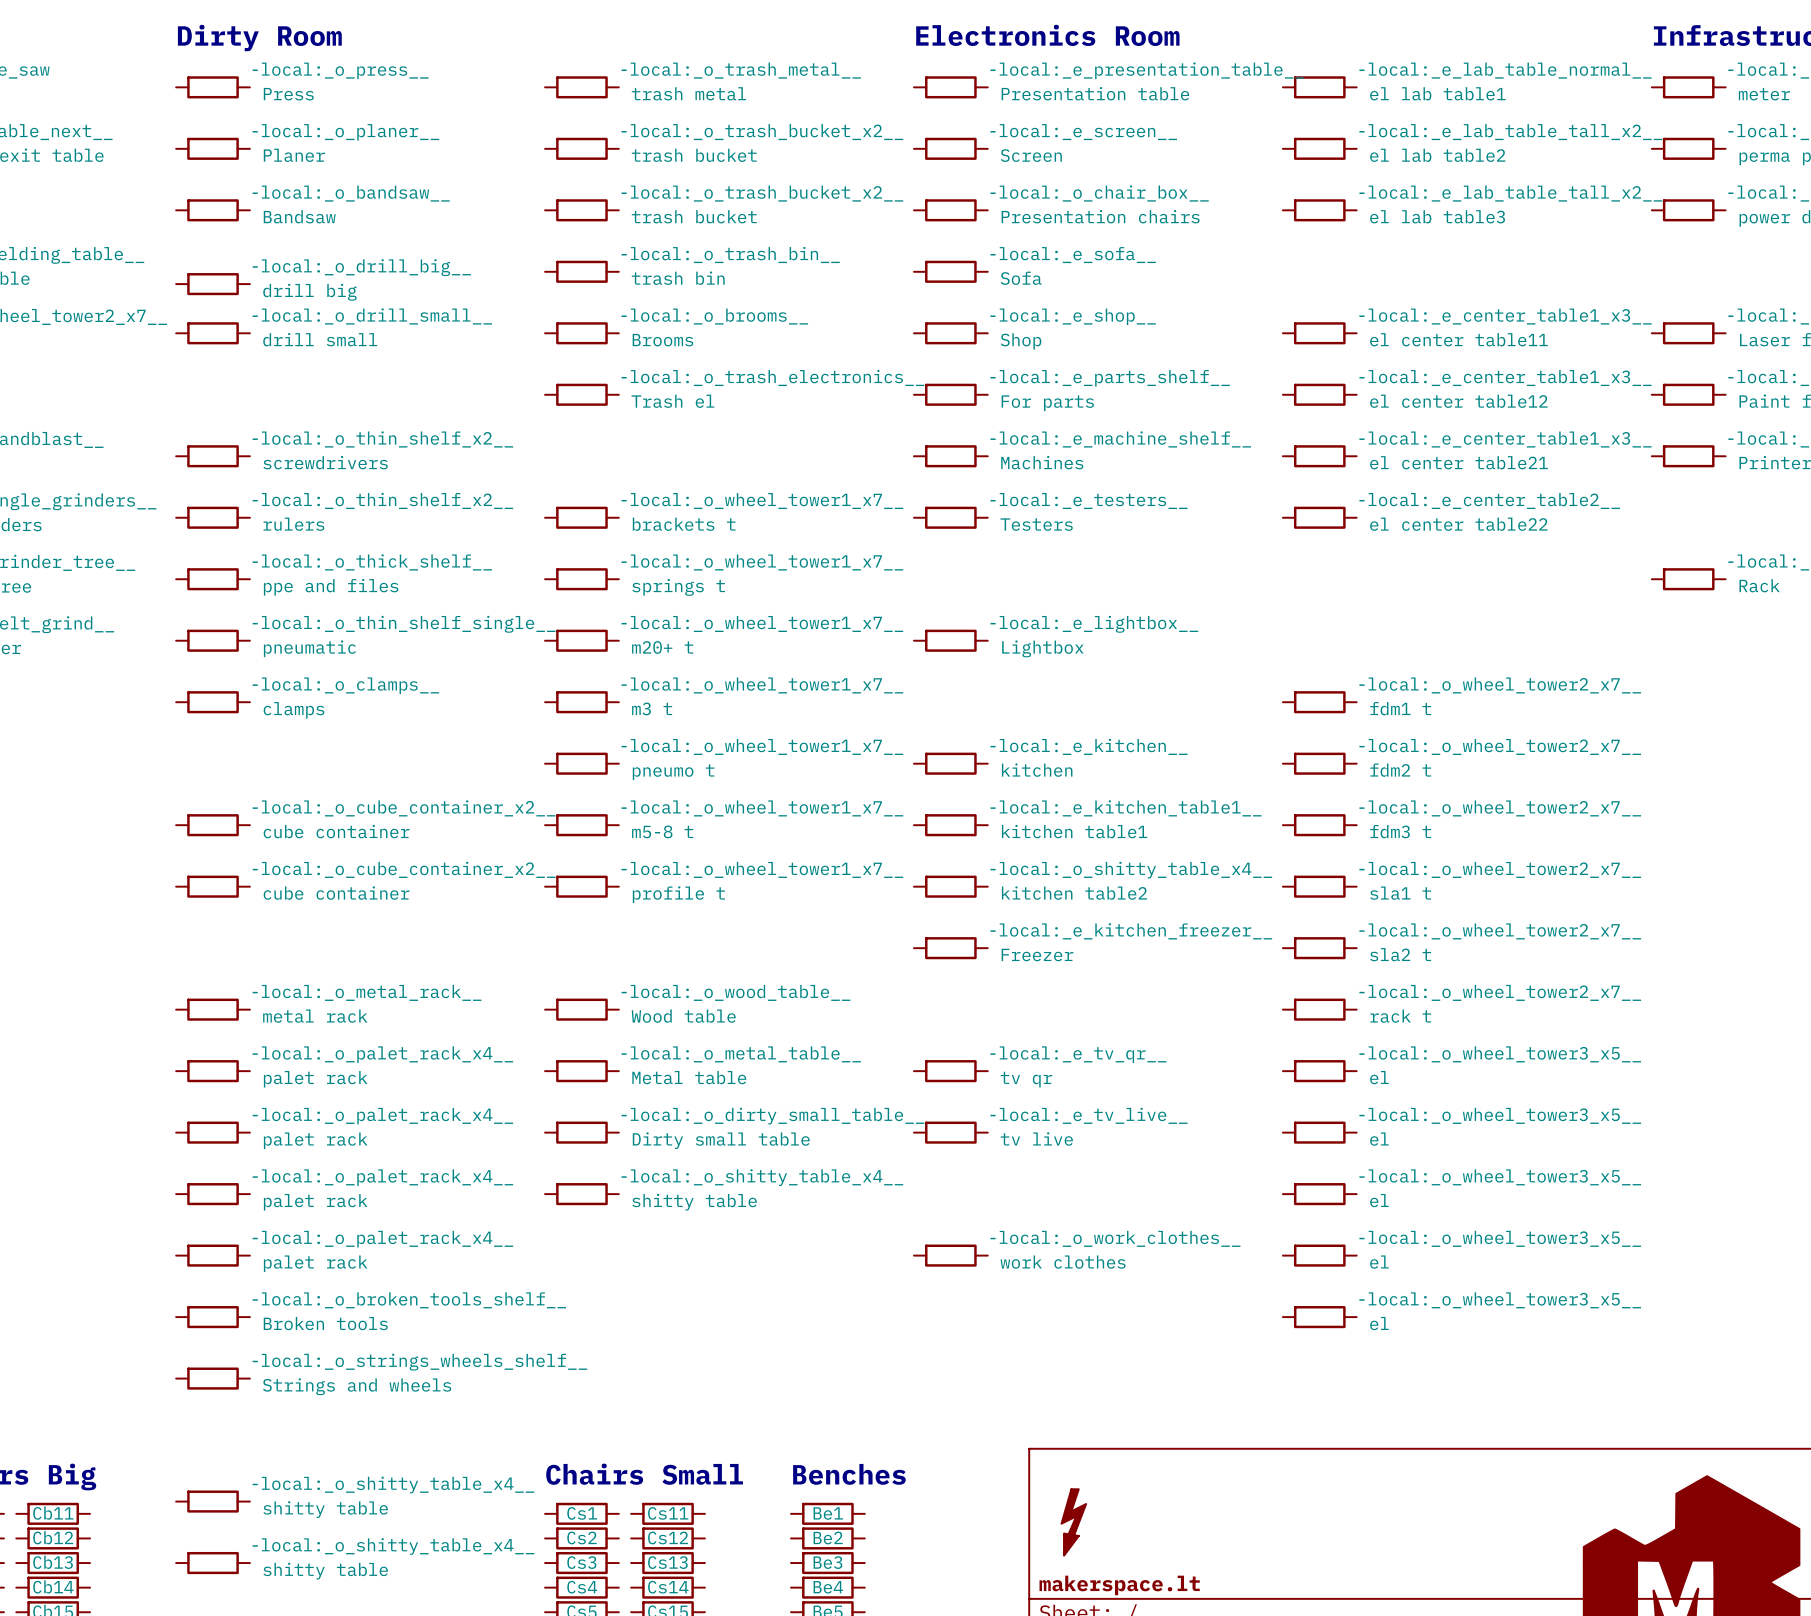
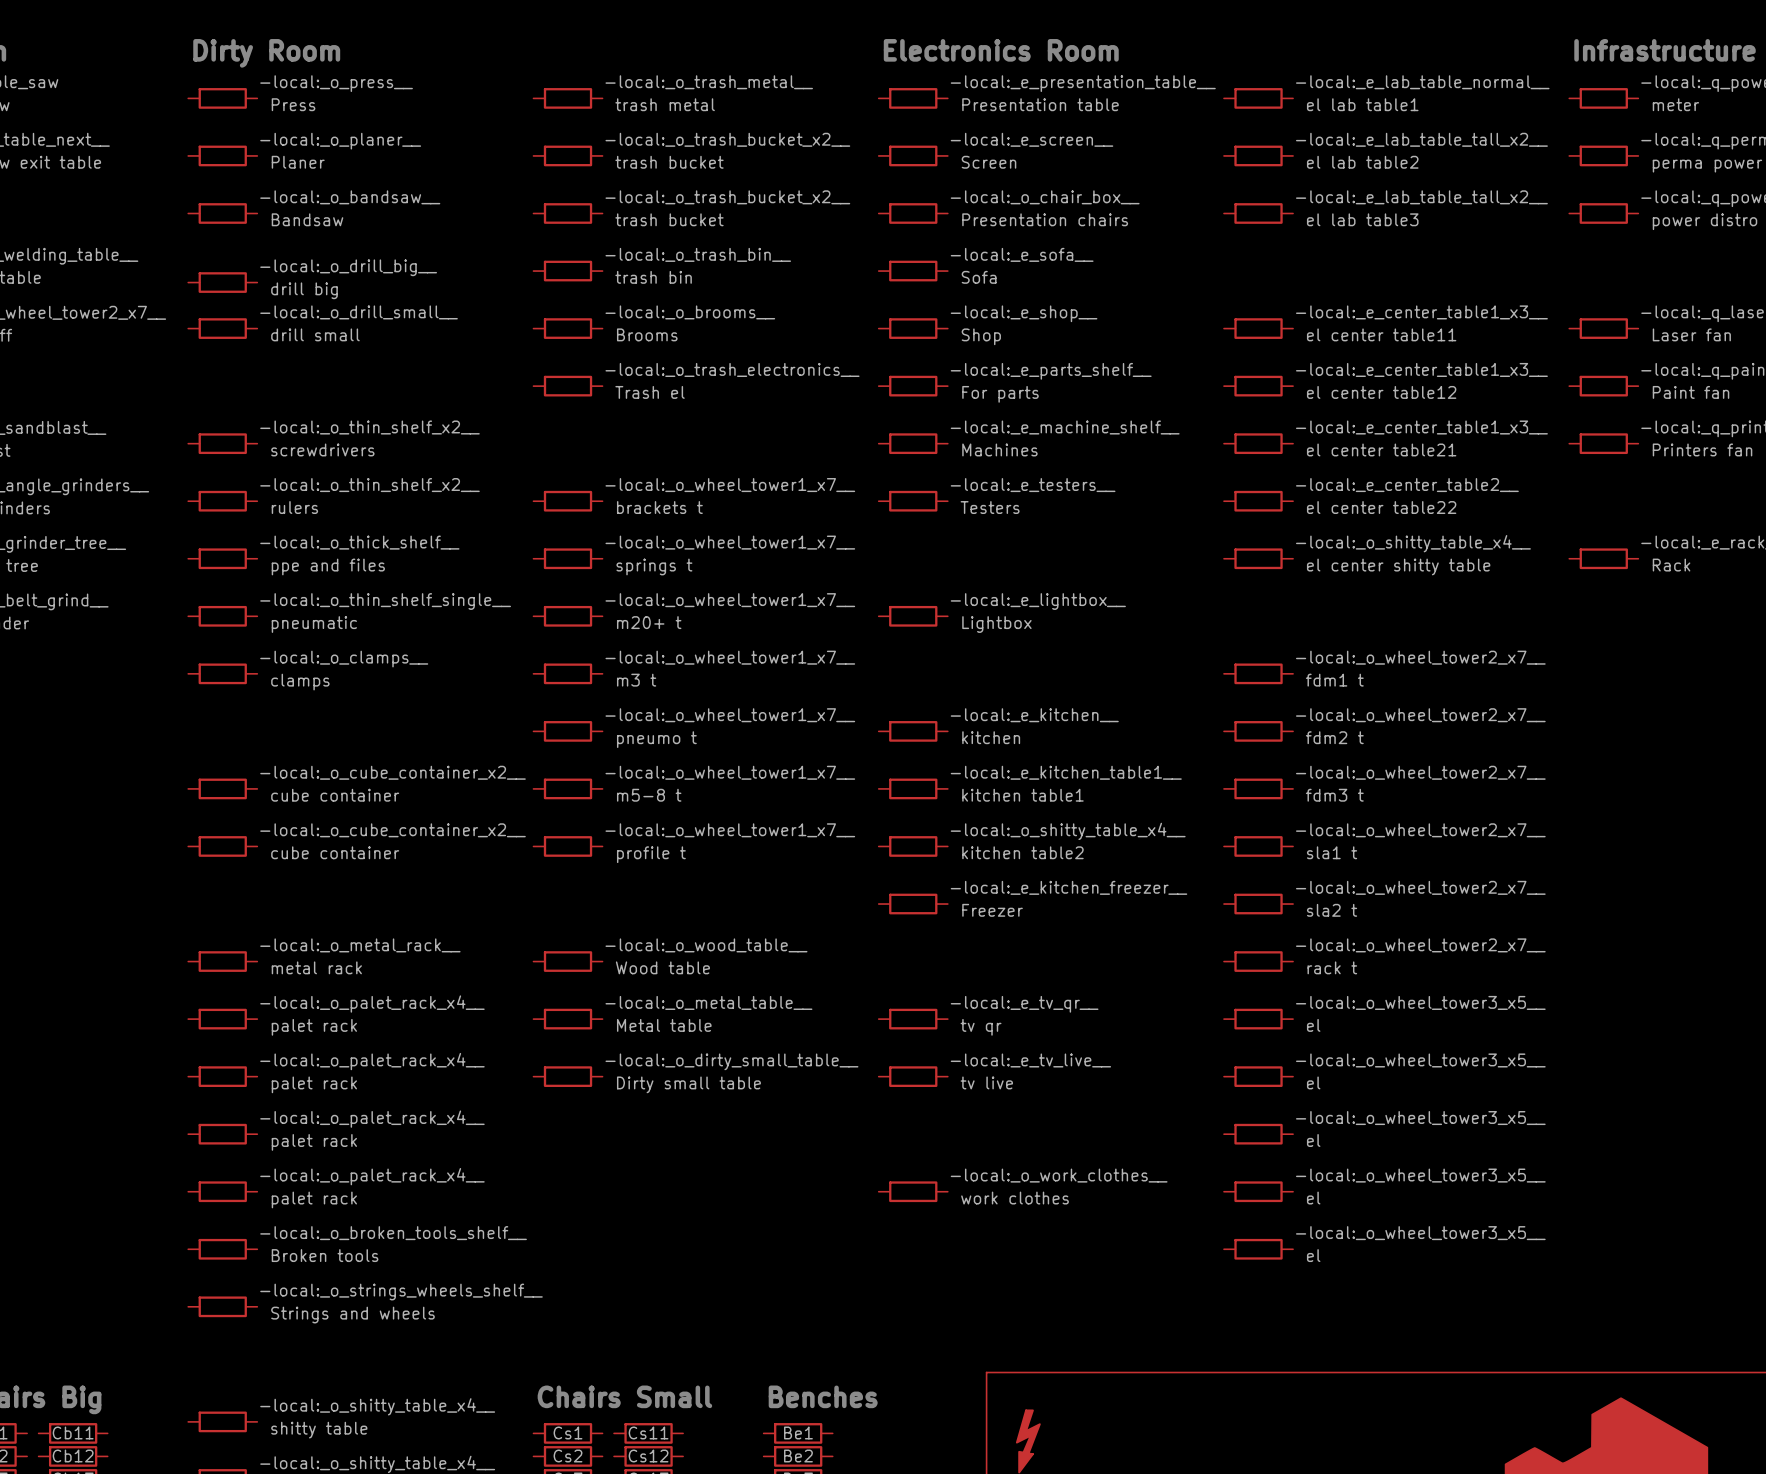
part: none -> el center shitty table (1258, 558)
part: shitty table (581, 1194) -> none

